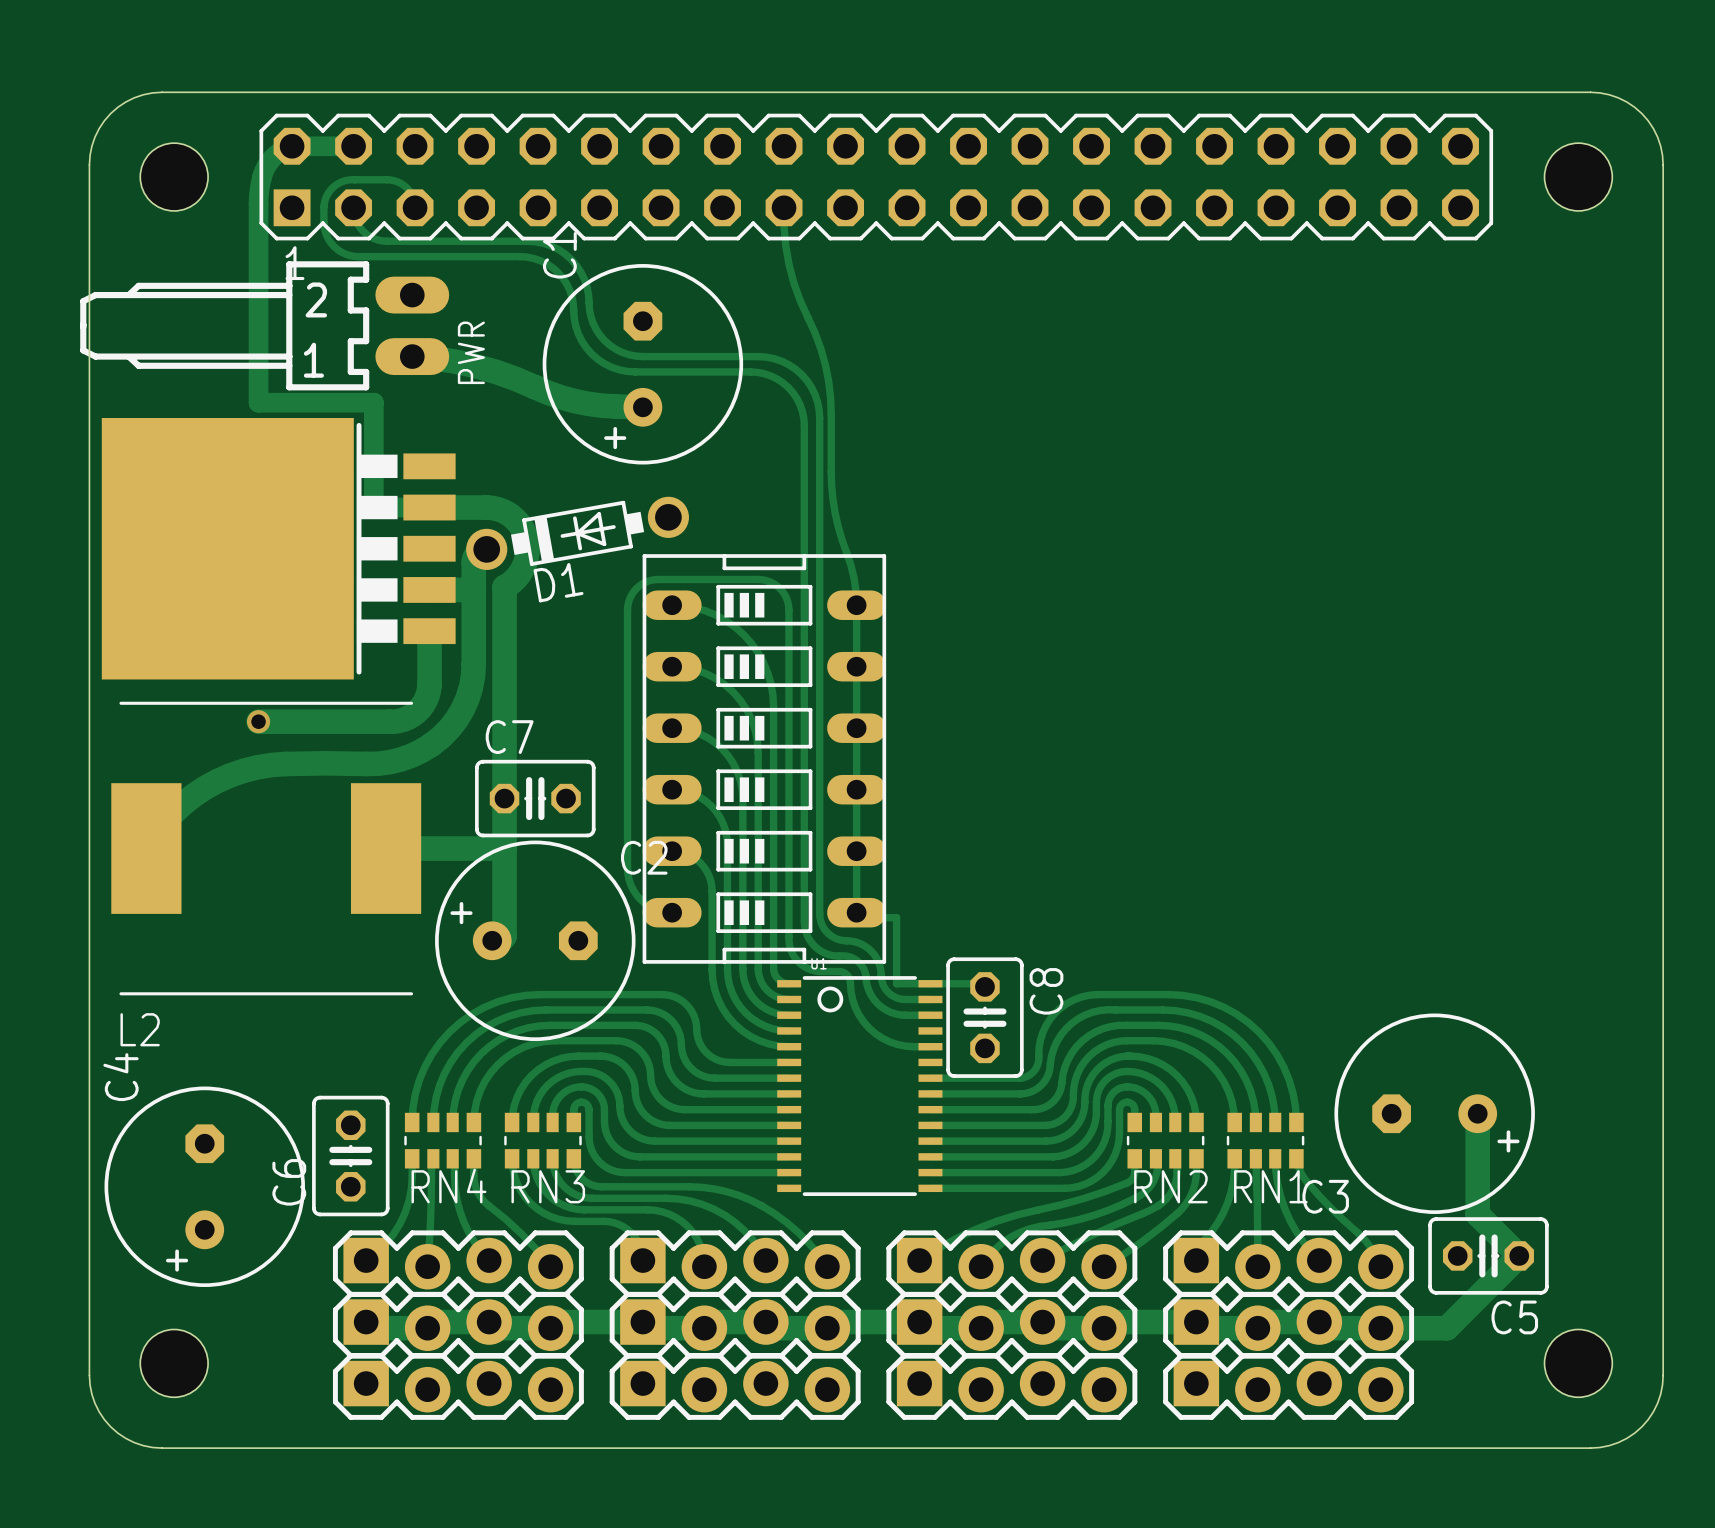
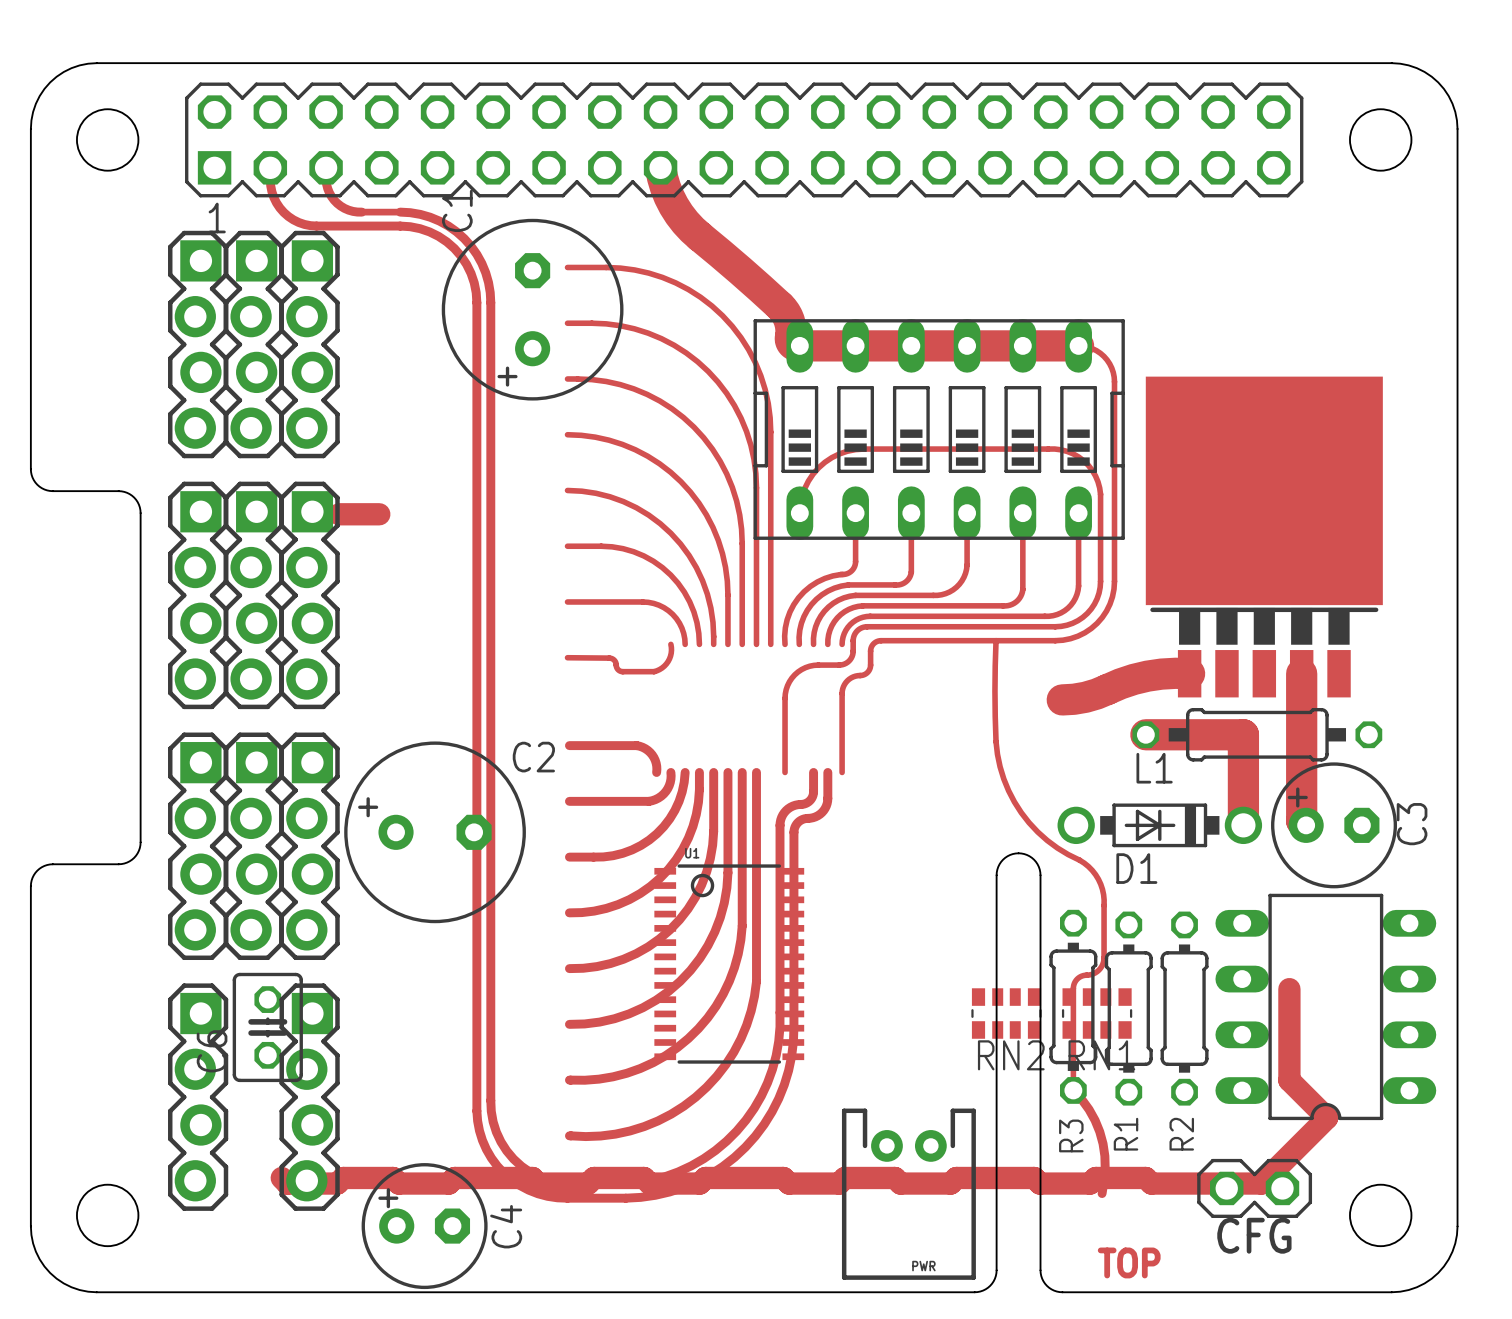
track: (353, 146) (292, 146) (273, 157) (264, 170) (258, 203) (258, 402) (373, 402) (373, 507) (491, 507) (511, 516) (524, 532) (527, 548) (525, 562) (515, 578) (504, 587) (504, 936) (499, 941) (492, 940) -> none
track: (353, 207) (354, 216) (360, 228) (370, 236) (378, 240) (527, 241) (543, 243) (558, 249) (571, 259) (584, 279) (590, 316) (596, 329) (610, 345) (622, 352) (642, 356) (766, 357) (788, 364) (806, 380) (817, 402) (819, 418) (820, 920) (825, 930) (833, 937) (859, 943) (871, 950) (878, 962) (883, 984) (890, 994) (902, 999) (930, 999) -> (270, 167) (270, 185) (273, 197) (283, 212) (293, 219) (310, 225) (400, 226) (429, 231) (454, 248) (466, 264) (474, 282) (476, 302) (476, 1111) (479, 1130) (486, 1149) (497, 1166) (511, 1179) (528, 1190) (557, 1197) (625, 1198) (655, 1195) (683, 1187) (710, 1174) (734, 1157) (755, 1136) (778, 1098) (791, 1056) (793, 1026) (794, 828) (800, 820) (815, 816) (825, 808) (827, 801) (827, 772)
track: (415, 207) (411, 193) (397, 181) (387, 179) (347, 180) (336, 184) (326, 195) (323, 206) (325, 231) (334, 246) (345, 254) (353, 256) (454, 256) -> (326, 167) (326, 184) (334, 200) (344, 208) (361, 212)
track: (784, 207) (784, 226) (789, 264) (800, 300) (820, 348) (828, 381) (832, 499) (838, 526) (850, 565) (855, 591) (856, 917) (896, 917) (896, 983) (984, 983) (984, 986) -> (660, 167) (669, 196) (679, 214) (692, 229) (782, 309) (790, 324) (790, 341) (794, 345) (1083, 346) (1092, 348) (1103, 356) (1113, 372) (1114, 581) (1112, 596) (1102, 617) (1084, 632) (1063, 640) (875, 642) (870, 648) (870, 666) (868, 671) (849, 679) (842, 688) (842, 772)
track: (496, 256) (533, 258) (546, 263) (557, 272) (569, 289) (575, 326) (581, 341) (597, 359) (611, 367) (635, 371) (757, 372) (771, 376) (783, 383) (797, 398) (802, 411) (804, 425) (805, 930) (811, 942) (821, 951) (834, 955) (848, 956) (858, 962) (865, 972) (871, 995) (881, 1006) (900, 1014) (930, 1015) -> (400, 212) (430, 217) (456, 231) (471, 246) (481, 263) (490, 292) (490, 1100) (496, 1132) (506, 1150) (521, 1166) (539, 1177) (560, 1183) (622, 1184) (650, 1180) (678, 1171) (703, 1158) (726, 1141) (745, 1120) (767, 1082) (778, 1041) (780, 822) (782, 814) (788, 808) (805, 803) (811, 798) (813, 772)
track: none -> (567, 267) (634, 269) (675, 282) (711, 306) (732, 326) (748, 349) (765, 389) (770, 417) (770, 644)
PWR: (264, 325) -> none
track: (412, 356) (475, 365) (574, 401) (602, 405) (642, 407) -> none
track: none -> (567, 323) (620, 325) (661, 338) (697, 361) (717, 382) (734, 405) (746, 431) (755, 473) (756, 644)
part: none -> (198, 344)
part: none -> (253, 344)
part: none -> (309, 344)
track: none -> (567, 378) (606, 381) (647, 394) (683, 417) (712, 449) (726, 474) (739, 515) (742, 543) (742, 644)
track: none -> (567, 434) (609, 440) (647, 456) (680, 481) (698, 503) (718, 540) (725, 567) (727, 595) (727, 644)
D1 rotation: 0° (577, 533) -> 170° counterclockwise (1159, 825)
D1 position: (577, 533) -> (1159, 825)
board edge: (89, 540) (89, 1000) -> (30, 469) (35, 482) (44, 489) (124, 491) (136, 499) (140, 513) (139, 848) (132, 859) (121, 864) (44, 865) (35, 872) (30, 886)
part: (278, 548) -> none
track: (486, 549) (478, 552) (473, 560) (473, 664) (470, 687) (456, 719) (440, 737) (421, 750) (389, 762) (271, 765) (230, 775) (204, 788) (181, 804) (162, 825) (146, 848) -> none
track: none -> (567, 490) (596, 493) (623, 501) (648, 515) (670, 533) (689, 555) (702, 580) (710, 608) (713, 644)
track: none -> (799, 513) (804, 488) (813, 474) (831, 457) (847, 451) (863, 449) (1061, 449) (1073, 453) (1083, 460) (1092, 470) (1098, 481) (1100, 494) (1100, 581) (1097, 598) (1091, 609) (1077, 620) (1061, 626) (867, 626) (860, 628) (854, 635) (852, 654) (847, 662) (841, 664) (809, 666) (798, 671) (789, 681) (785, 698) (785, 772)
track: none -> (855, 513) (855, 561) (853, 568) (847, 573) (832, 575) (817, 581) (798, 597) (787, 619) (785, 644)
track: none -> (911, 513) (911, 572) (908, 579) (898, 584) (848, 584) (827, 591) (816, 599) (807, 610) (799, 630) (799, 644)
track: none -> (967, 513) (966, 569) (961, 580) (956, 587) (945, 593) (937, 595) (855, 595) (843, 597) (828, 606) (820, 615) (814, 632) (813, 644)
track: none -> (1022, 513) (1022, 589) (1020, 596) (1014, 603) (1005, 605) (858, 606) (844, 611) (837, 617) (829, 630) (827, 644)
track: none -> (1078, 513) (1078, 590) (1070, 605) (1061, 612) (1049, 616) (866, 616) (856, 620) (847, 627) (842, 644)
track: (672, 605) (705, 610) (735, 627) (758, 652) (767, 673) (773, 706) (773, 970) (778, 979) (789, 983) -> none
part: none -> (1264, 537)
track: none -> (567, 546) (623, 548) (643, 555) (662, 567) (678, 583) (689, 601) (696, 622) (699, 644)
track: (429, 631) (428, 690) (423, 704) (408, 717) (394, 721) (258, 721) -> none
track: (672, 666) (694, 669) (724, 684) (740, 700) (751, 719) (758, 752) (758, 972) (760, 980) (767, 990) (777, 997) (789, 999) -> none
part: none -> (198, 595)
part: none -> (253, 595)
part: none -> (309, 595)
track: none -> (567, 601) (642, 601) (658, 605) (672, 614) (679, 623) (685, 644)
via: (258, 721) -> none
track: (672, 728) (690, 730) (707, 737) (722, 748) (737, 771) (742, 798) (744, 980) (752, 997) (760, 1005) (777, 1013) (789, 1015) -> none
track: none -> (996, 640) (996, 741) (1000, 766) (1008, 790) (1021, 812) (1037, 831) (1057, 848) (1084, 863) (1092, 870) (1098, 879) (1103, 894) (1103, 962) (1095, 972) (1078, 977) (1073, 988) (1073, 1090) (1089, 1109) (1099, 1131) (1104, 1156) (1102, 1193)
track: none -> (670, 644) (671, 653) (668, 661) (662, 667) (654, 671) (621, 671) (617, 668) (614, 660) (610, 658) (567, 657)
part rotation: 0° (764, 758) -> 90° counterclockwise (939, 429)
part position: (764, 758) -> (939, 429)
track: none -> (1189, 673) (1147, 676) (1085, 697) (1062, 699)
track: none -> (1301, 673) (1301, 820) (1306, 825)
track: (672, 789) (693, 793) (705, 801) (720, 817) (725, 830) (727, 845) (727, 969) (732, 992) (740, 1006) (758, 1022) (773, 1028) (789, 1030) -> none
C7: (535, 798) -> none
track: none -> (1145, 734) (1243, 734) (1243, 825)
L1: none -> (1257, 734)
track: none -> (569, 745) (639, 746) (647, 750) (653, 757) (656, 772)
L2: (266, 848) -> none
track: (386, 848) (504, 848) -> none
track: (672, 851) (682, 852) (696, 859) (706, 871) (710, 880) (712, 979) (722, 1008) (734, 1024) (750, 1036) (769, 1044) (789, 1046) -> none
track: none -> (670, 772) (670, 782) (665, 791) (652, 800) (569, 801)
track: none -> (685, 772) (682, 791) (674, 810) (663, 826) (649, 840) (632, 849) (613, 855) (569, 857)
track: none -> (699, 772) (698, 802) (692, 826) (682, 849) (668, 869) (650, 886) (618, 904) (594, 911) (569, 912)
track: none -> (713, 772) (713, 831) (710, 858) (701, 884) (688, 908) (659, 938) (636, 953) (610, 963) (569, 968)
track: none -> (727, 772) (726, 888) (720, 917) (708, 945) (680, 981) (642, 1007) (614, 1018) (569, 1024)
track: none -> (742, 772) (742, 925) (738, 954) (723, 993) (707, 1017) (688, 1038) (653, 1062) (613, 1076) (569, 1080)
track: none -> (756, 772) (756, 981) (751, 1010) (740, 1038) (716, 1076) (695, 1097) (671, 1114) (644, 1126) (615, 1134) (569, 1135)
track: (672, 912) (655, 909) (640, 899) (630, 885) (627, 873) (628, 602) (633, 591) (639, 585) (654, 579) (766, 580) (779, 588) (786, 598) (788, 606) (788, 936) (790, 949) (797, 960) (807, 968) (819, 971) (840, 971) (847, 974) (850, 980) (855, 1007) (863, 1021) (875, 1033) (897, 1044) (930, 1046) -> none
part: none -> (198, 846)
part: none -> (253, 846)
part: none -> (309, 846)
C3 footprint: [1334, 1013, 1535, 1214] -> [1271, 762, 1398, 889]
C8: (984, 1017) -> none
track: (789, 1062) (729, 1062) (713, 1057) (703, 1049) (699, 1041) (695, 1020) (689, 1008) (679, 999) (671, 995) (525, 995) (511, 997) (484, 1007) (460, 1022) (440, 1042) (431, 1054) (419, 1080) (415, 1094) (412, 1122) -> none
C4 name position: C4 (120, 1077) -> C4 (506, 1226)
track: (789, 1078) (714, 1078) (698, 1073) (688, 1065) (683, 1057) (680, 1035) (674, 1023) (664, 1014) (655, 1011) (533, 1010) (497, 1021) (466, 1042) (444, 1073) (436, 1097) (433, 1122) -> none
track: (930, 1078) (1020, 1078) (1028, 1075) (1037, 1066) (1040, 1040) (1049, 1019) (1060, 1008) (1081, 997) (1096, 994) (1182, 995) (1210, 1001) (1224, 1007) (1236, 1014) (1258, 1032) (1268, 1042) (1283, 1066) (1293, 1094) (1296, 1122) -> none
C4 footprint: [104, 1086, 305, 1288] -> [361, 1163, 488, 1290]
track: (789, 1093) (703, 1093) (689, 1091) (680, 1086) (671, 1075) (667, 1065) (664, 1048) (659, 1037) (650, 1029) (643, 1026) (538, 1025) (507, 1034) (481, 1053) (462, 1080) (455, 1100) (452, 1122) -> none
track: (930, 1093) (1020, 1093) (1031, 1091) (1041, 1085) (1046, 1078) (1053, 1048) (1061, 1034) (1078, 1018) (1092, 1012) (1107, 1009) (1175, 1010) (1211, 1021) (1242, 1042) (1257, 1062) (1268, 1085) (1275, 1122) -> none
track: (789, 1109) (676, 1108) (667, 1105) (657, 1096) (651, 1084) (647, 1062) (640, 1050) (633, 1045) (615, 1040) (555, 1040) (524, 1046) (497, 1064) (480, 1091) (473, 1122) -> none
track: (930, 1109) (1042, 1108) (1057, 1097) (1067, 1059) (1076, 1046) (1088, 1035) (1111, 1026) (1158, 1025) (1190, 1030) (1210, 1040) (1227, 1053) (1246, 1080) (1253, 1100) (1255, 1122) -> none
track: (512, 1122) (514, 1105) (520, 1089) (538, 1069) (561, 1058) (600, 1056) (617, 1060) (628, 1069) (634, 1081) (636, 1099) (639, 1108) (648, 1118) (656, 1122) (669, 1125) (789, 1125) -> none
track: (533, 1122) (536, 1101) (547, 1085) (557, 1077) (568, 1073) (589, 1071) (602, 1076) (612, 1084) (618, 1097) (621, 1115) (624, 1123) (630, 1130) (641, 1138) (654, 1141) (789, 1141) -> none
track: (552, 1122) (553, 1108) (561, 1095) (570, 1089) (584, 1087) (592, 1089) (601, 1098) (604, 1106) (607, 1134) (614, 1146) (626, 1154) (639, 1156) (789, 1156) -> none
track: (573, 1122) (574, 1105) (579, 1102) (585, 1103) (589, 1108) (589, 1141) (591, 1150) (599, 1162) (615, 1171) (789, 1172) -> none
track: (1134, 1122) (1133, 1105) (1129, 1102) (1123, 1103) (1119, 1108) (1119, 1140) (1112, 1160) (1097, 1176) (1078, 1186) (1064, 1188) (930, 1188) -> none
track: (1155, 1122) (1154, 1108) (1147, 1095) (1134, 1087) (1122, 1087) (1113, 1092) (1108, 1101) (1107, 1127) (1102, 1146) (1094, 1156) (1079, 1168) (1060, 1172) (930, 1172) -> none
track: (1175, 1122) (1171, 1101) (1161, 1085) (1145, 1075) (1123, 1071) (1111, 1075) (1100, 1086) (1096, 1098) (1095, 1121) (1091, 1132) (1080, 1146) (1070, 1152) (1053, 1156) (930, 1156) -> none
track: (1196, 1122) (1191, 1097) (1177, 1075) (1155, 1061) (1127, 1056) (1110, 1060) (1096, 1070) (1087, 1085) (1083, 1112) (1079, 1121) (1069, 1133) (1060, 1138) (1045, 1141) (930, 1141) -> none
track: (1234, 1122) (1231, 1101) (1223, 1081) (1202, 1057) (1174, 1043) (1152, 1040) (1127, 1040) (1106, 1044) (1094, 1051) (1084, 1061) (1075, 1080) (1070, 1109) (1057, 1122) (1046, 1125) (930, 1125) -> none
R3: none -> (1073, 1006)
part: none -> (1325, 1006)
R1: none -> (1128, 1008)
R2: none -> (1184, 1008)
RN4: (443, 1140) -> none
RN3: (542, 1140) -> none
track: (412, 1158) (411, 1187) (405, 1212) (393, 1234) (385, 1244) (366, 1260) -> none
track: (433, 1158) (431, 1158) (427, 1266) -> none
track: (452, 1158) (454, 1158) (456, 1198) (463, 1221) (474, 1242) (489, 1260) -> none
track: (473, 1158) (474, 1179) (480, 1196) (521, 1234) (550, 1266) -> none
track: (512, 1158) (514, 1174) (520, 1190) (536, 1208) (550, 1216) (566, 1220) (608, 1221) (618, 1224) (627, 1229) (637, 1240) (642, 1260) -> none
track: (533, 1158) (535, 1172) (543, 1189) (553, 1199) (564, 1205) (584, 1209) (654, 1210) (675, 1217) (687, 1226) (696, 1238) (702, 1251) (704, 1266) -> none
track: (552, 1158) (555, 1173) (560, 1182) (568, 1190) (581, 1196) (678, 1198) (713, 1209) (744, 1230) (765, 1260) -> none
track: (573, 1158) (579, 1175) (594, 1185) (701, 1187) (726, 1191) (750, 1200) (774, 1213) (798, 1232) (827, 1266) -> none
track: (1134, 1158) (1134, 1175) (1127, 1182) (1083, 1198) (996, 1221) (956, 1238) (919, 1260) -> none
track: (1155, 1158) (1157, 1158) (1157, 1168) (1153, 1180) (1148, 1188) (1138, 1196) (1093, 1215) (1019, 1232) (1001, 1243) (981, 1266) -> none
track: (1175, 1158) (1177, 1158) (1175, 1181) (1172, 1191) (1162, 1202) (1042, 1260) -> none
track: (1196, 1158) (1193, 1189) (1181, 1209) (1141, 1241) (1104, 1266) -> none
track: (1234, 1158) (1233, 1181) (1227, 1202) (1217, 1222) (1199, 1246) (1196, 1260) -> none
track: (1255, 1158) (1257, 1266) -> none
track: (1275, 1158) (1277, 1184) (1284, 1208) (1296, 1231) (1319, 1260) -> none
track: (1296, 1158) (1300, 1171) (1307, 1182) (1366, 1241) (1380, 1266) -> none
C3 name position: C3 (1325, 1196) -> C3 (1412, 824)
part: none -> (198, 1097)
part: none -> (309, 1097)
C5: (1488, 1255) -> none
part: (458, 1263) -> none
part: (735, 1263) -> none
part: (1011, 1263) -> none
part: (1288, 1263) -> none
part: (458, 1325) -> none
part: (735, 1325) -> none
part: (1011, 1325) -> none
part: (1288, 1325) -> none
CFG: none -> (1254, 1188)
PWR: none -> (908, 1194)
part: (458, 1386) -> none
part: (735, 1386) -> none
part: (1011, 1386) -> none
part: (1288, 1386) -> none
text: none -> TOP (1129, 1262)
board edge: (1130, 1448) (1227, 1448) -> (974, 1292) (983, 1290) (990, 1285) (994, 1278) (996, 1270) (996, 872) (999, 864) (1005, 857) (1018, 853) (1031, 857) (1037, 864) (1040, 872) (1040, 1270) (1042, 1278) (1046, 1285) (1054, 1290) (1062, 1292)

